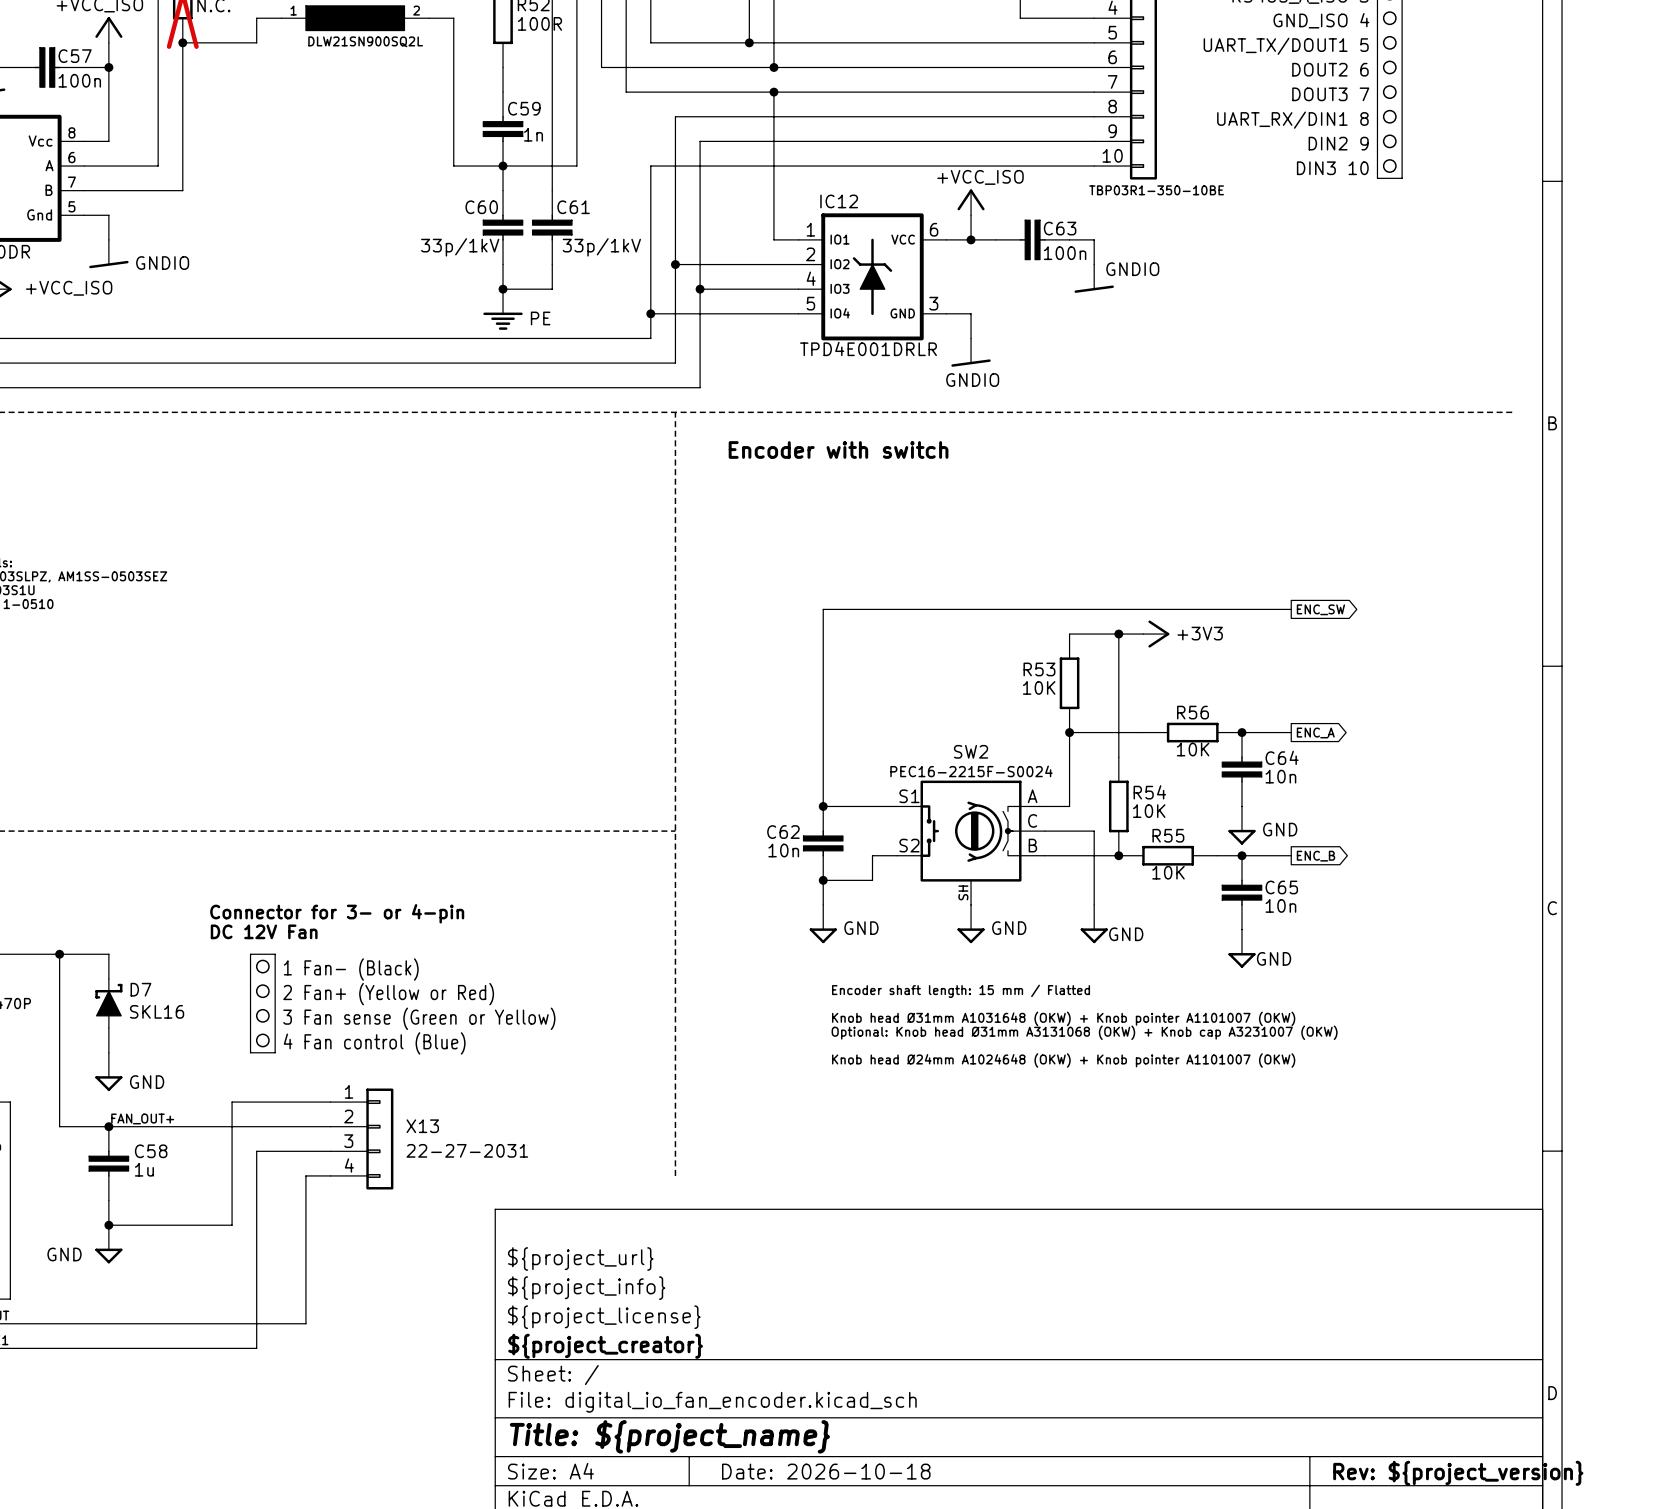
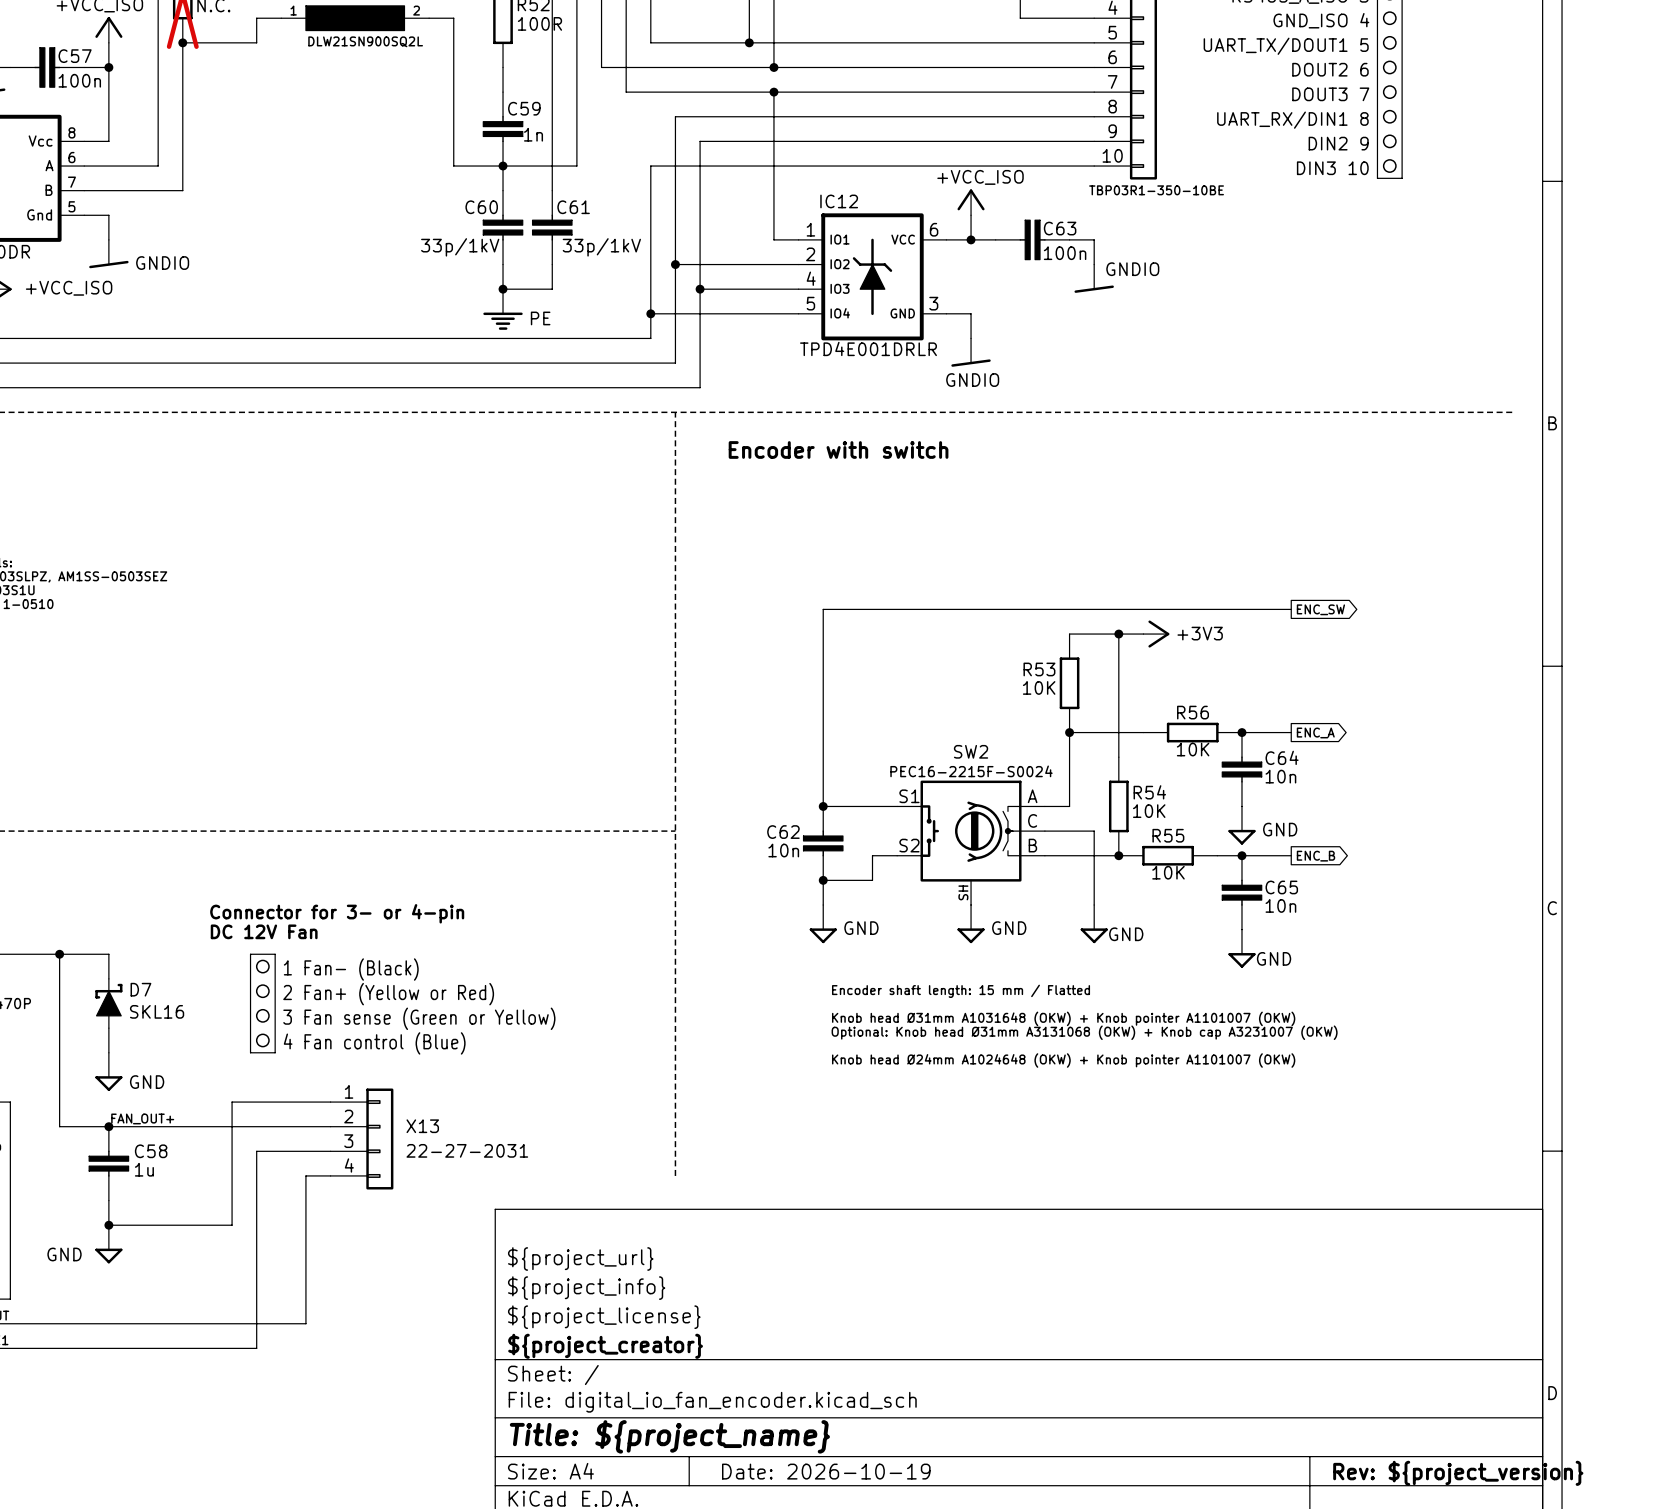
title block: Date: 2026-10-18 (826, 1471) -> Date: 2026-10-19 (826, 1471)

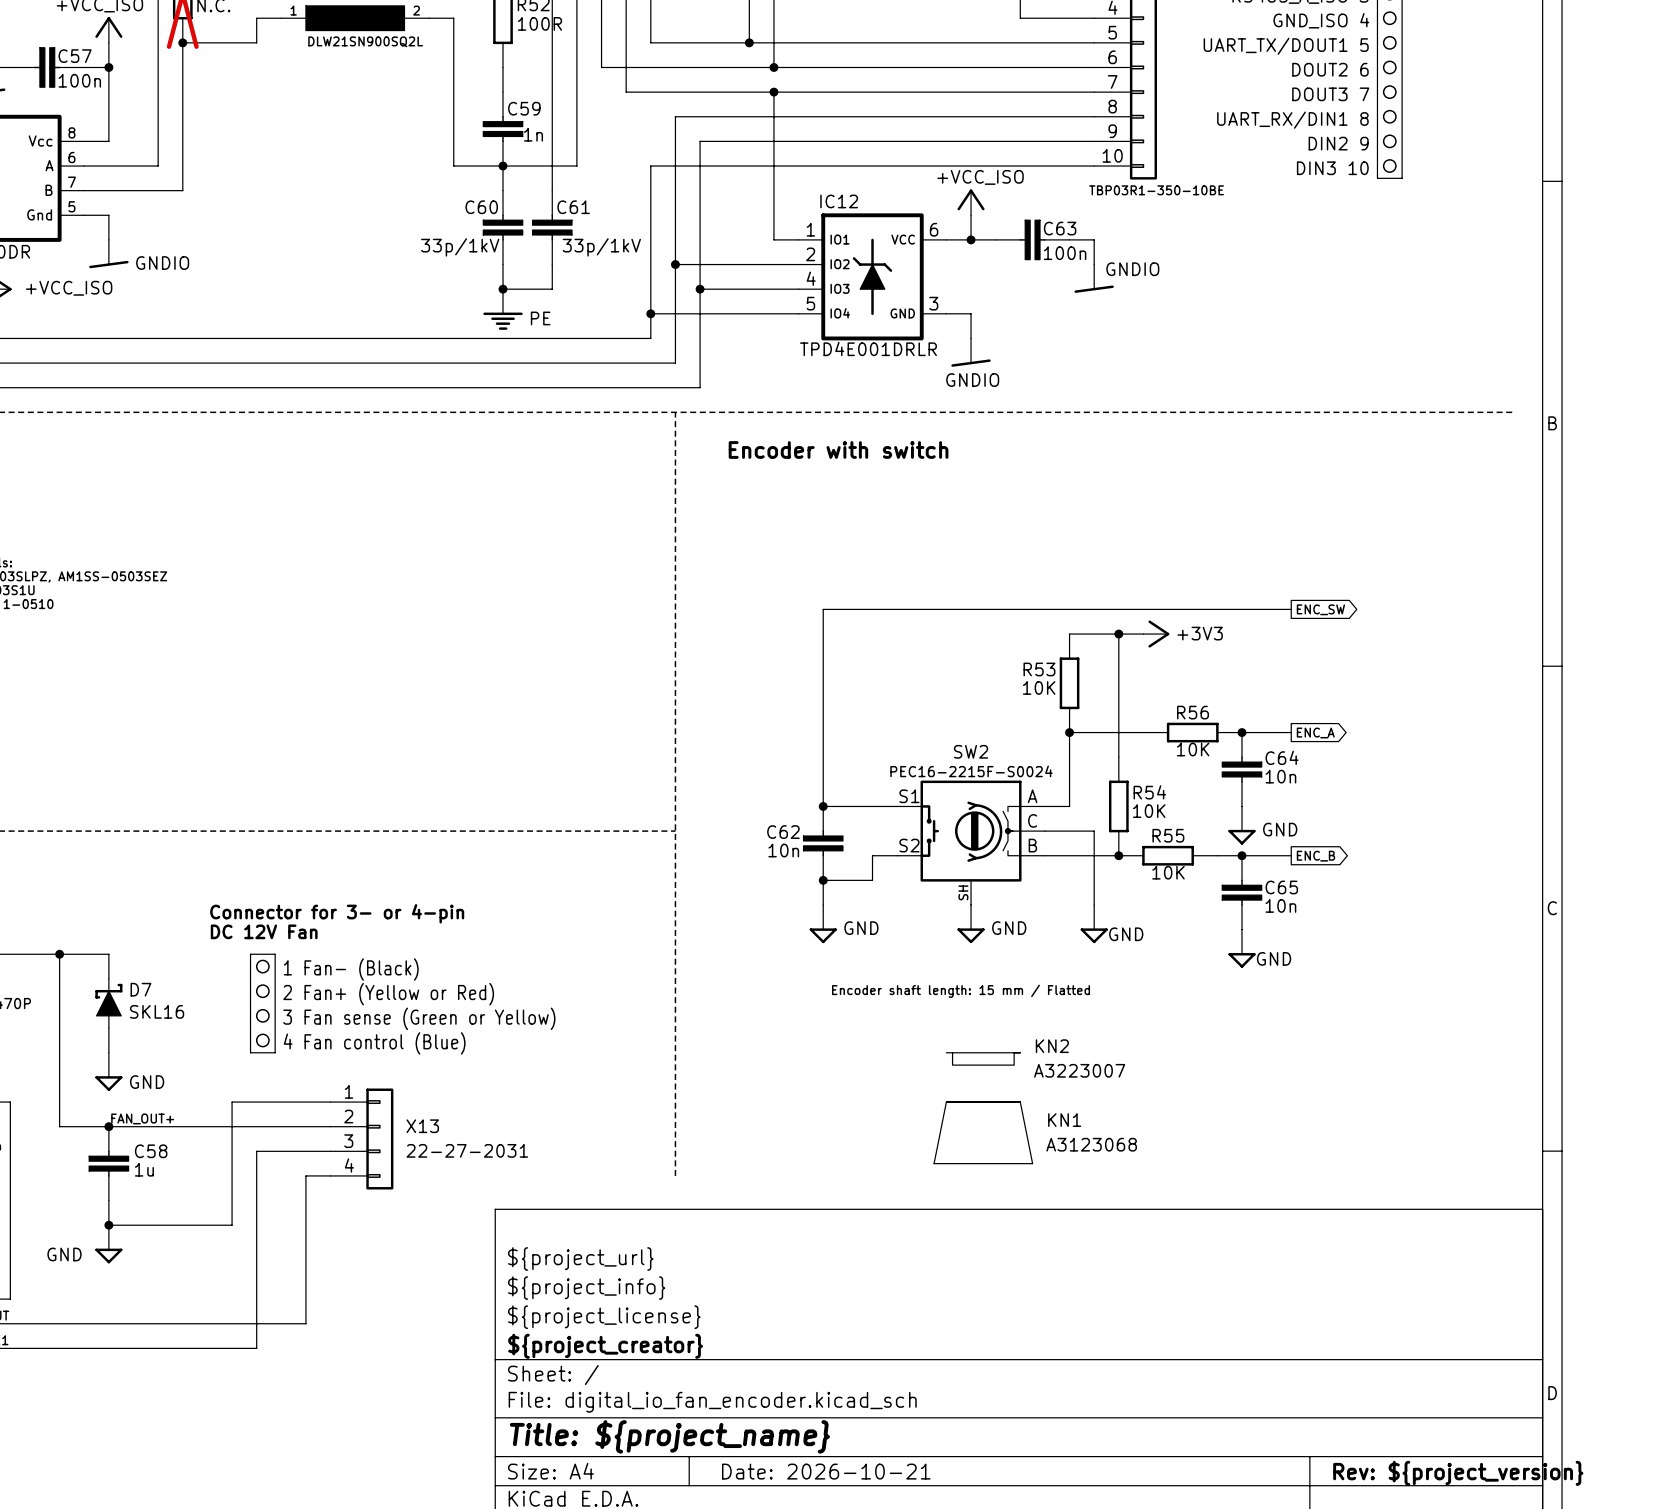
text: Knob head Ø31mm A1031648 (OKW) + Knob pointer A1101007 (OKW) (1063, 1018) -> none
text: Optional: Knob head Ø31mm A3131068 (OKW) + Knob cap A3231007 (OKW) (1084, 1032) -> none
KN2: none -> A3223007 (983, 1058)
text: Knob head Ø24mm A1024648 (OKW) + Knob pointer A1101007 (OKW) (1063, 1060) -> none
KN1: none -> A3123068 (983, 1132)
title block: Date: 2026-10-19 (826, 1471) -> Date: 2026-10-21 (826, 1471)

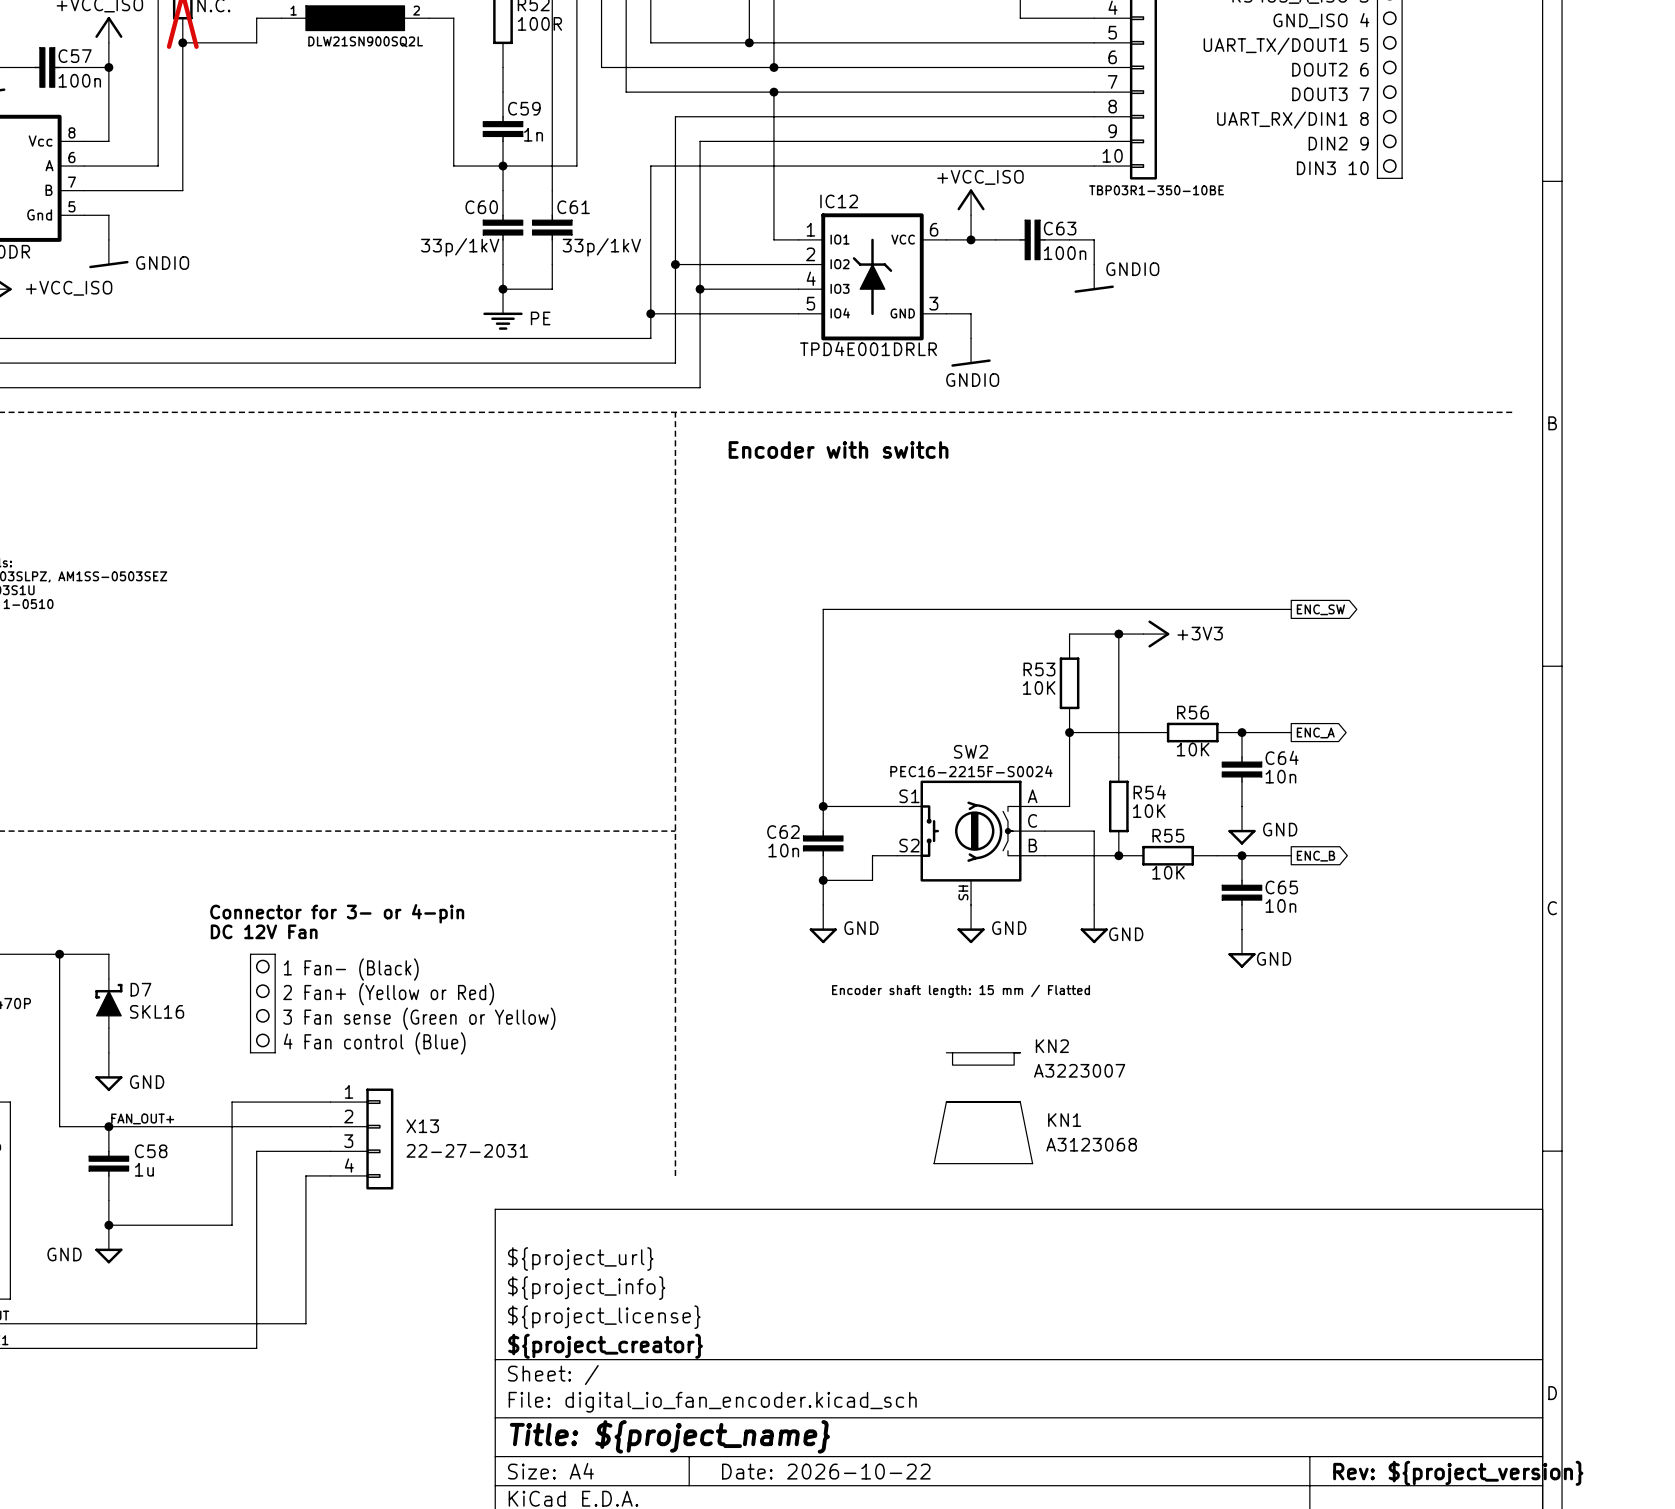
title block: Date: 2026-10-21 (826, 1471) -> Date: 2026-10-22 (826, 1471)

